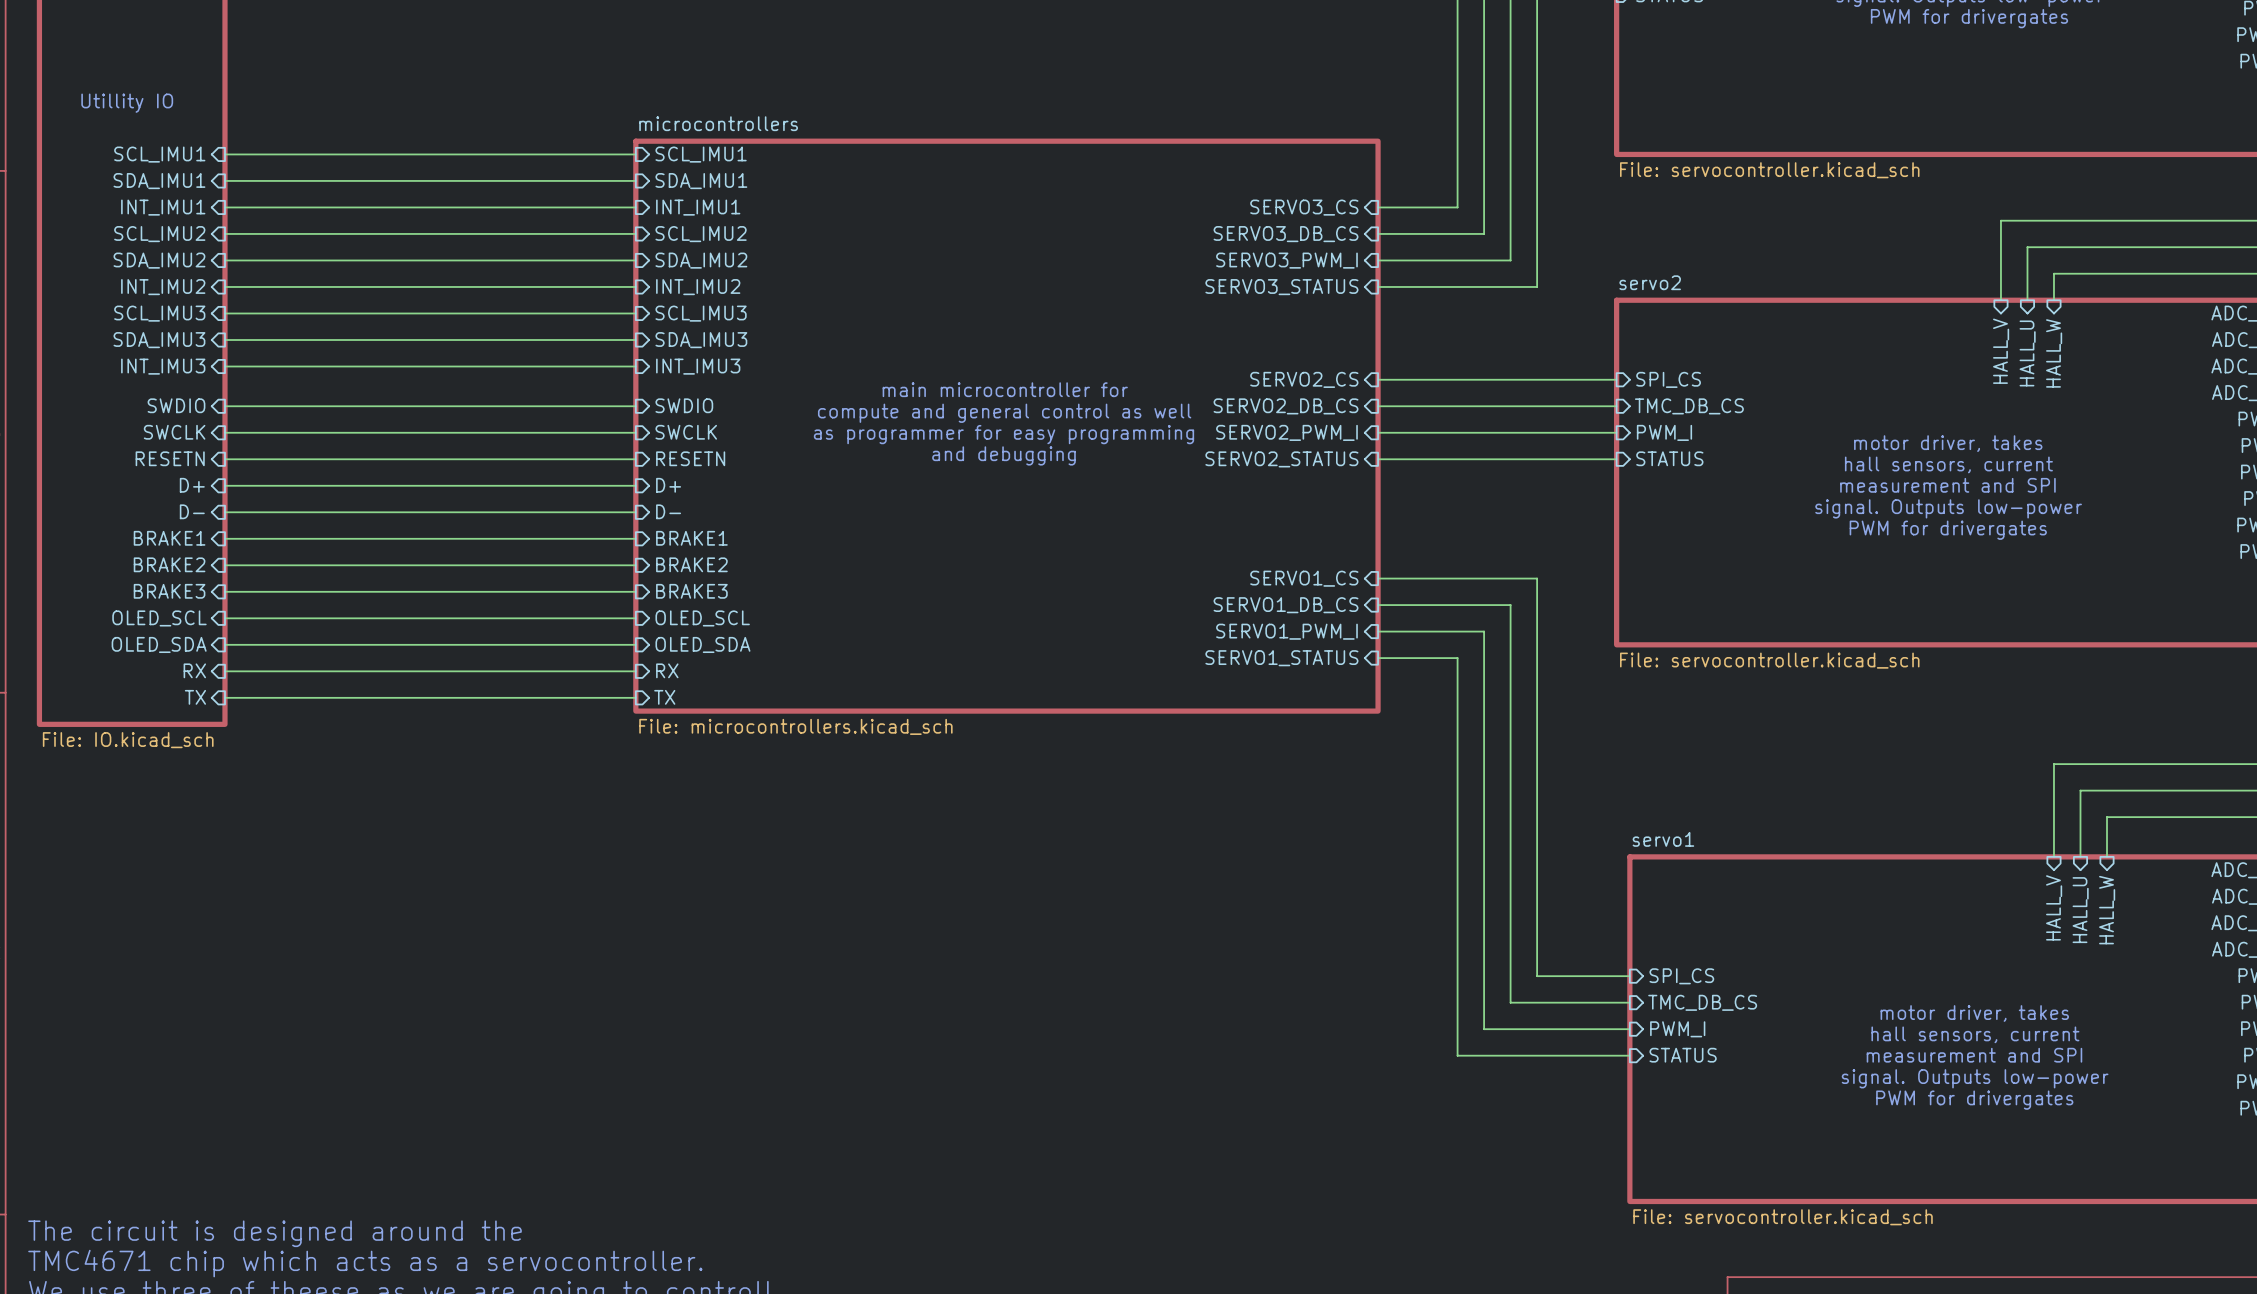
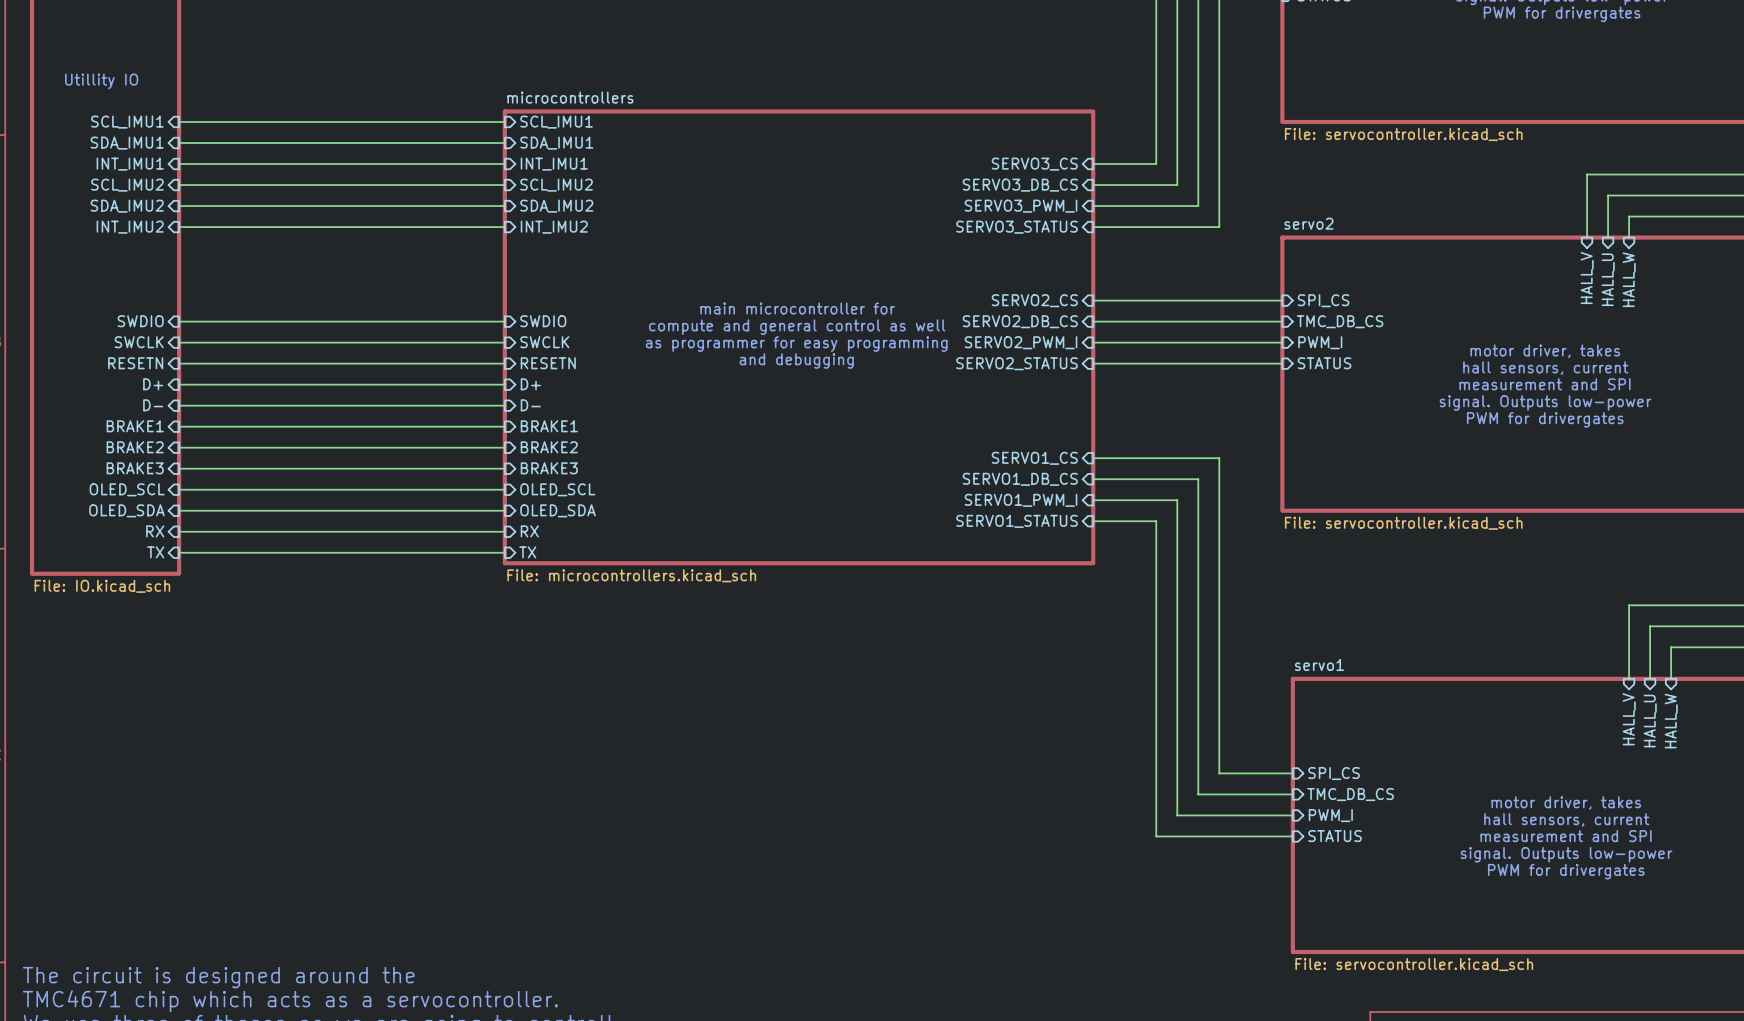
sheet pin: SCL_IMU3 (159, 313) -> none
wire: (224, 313) (635, 313) -> none
sheet pin: SCL_IMU3 (701, 313) -> none
wire: (224, 339) (635, 339) -> none
sheet pin: SDA_IMU3 (159, 340) -> none
sheet pin: SDA_IMU3 (701, 340) -> none
sheet pin: INT_IMU3 (163, 366) -> none
wire: (224, 366) (635, 366) -> none
sheet pin: INT_IMU3 (698, 366) -> none

